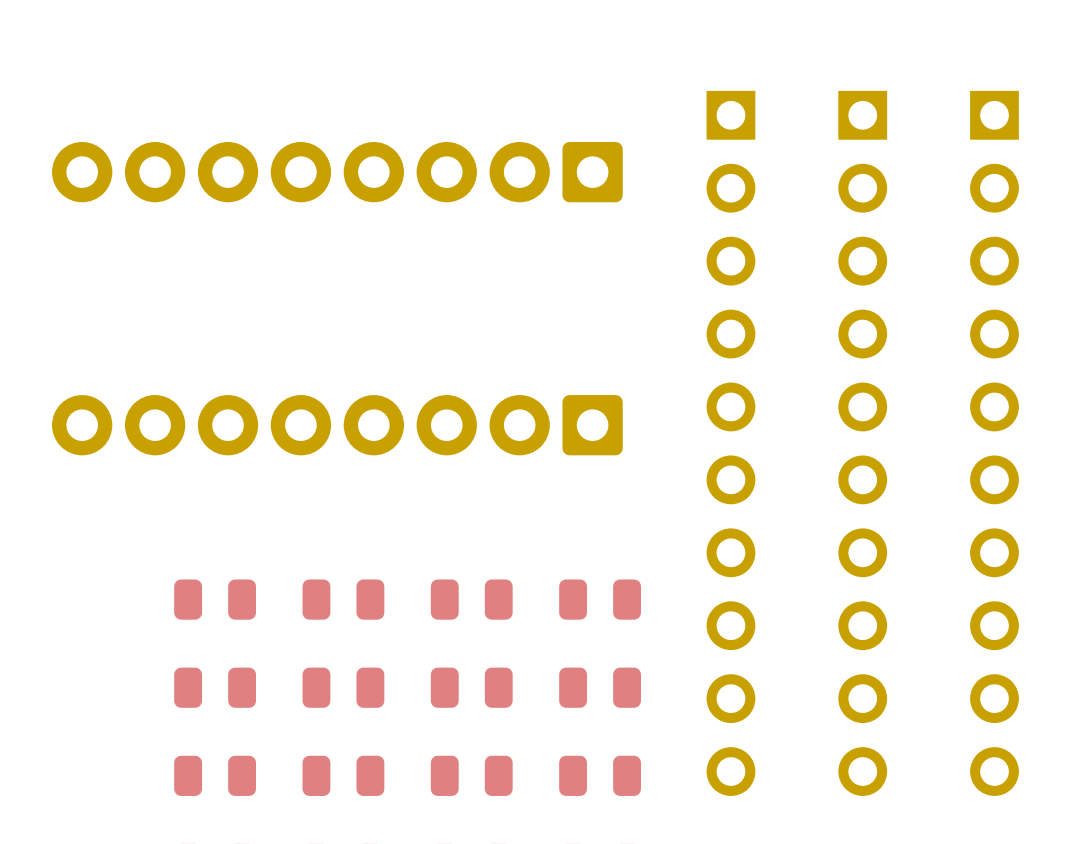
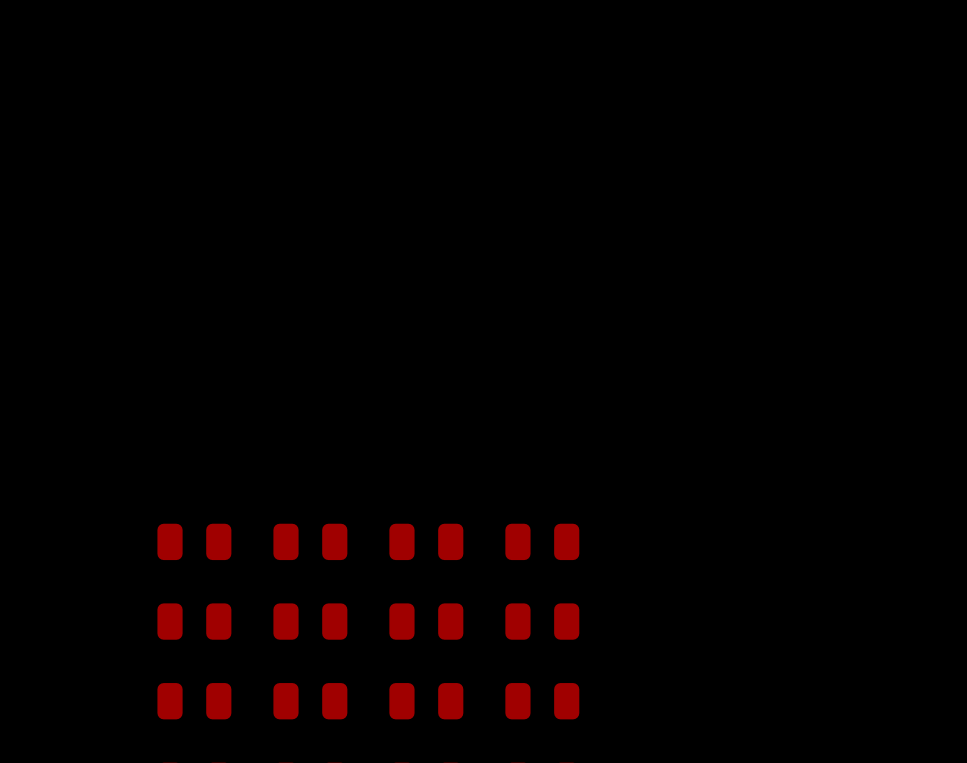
part: (337, 172) -> none
part: (337, 425) -> none
part: (730, 443) -> none
part: (862, 443) -> none
part: (994, 443) -> none

